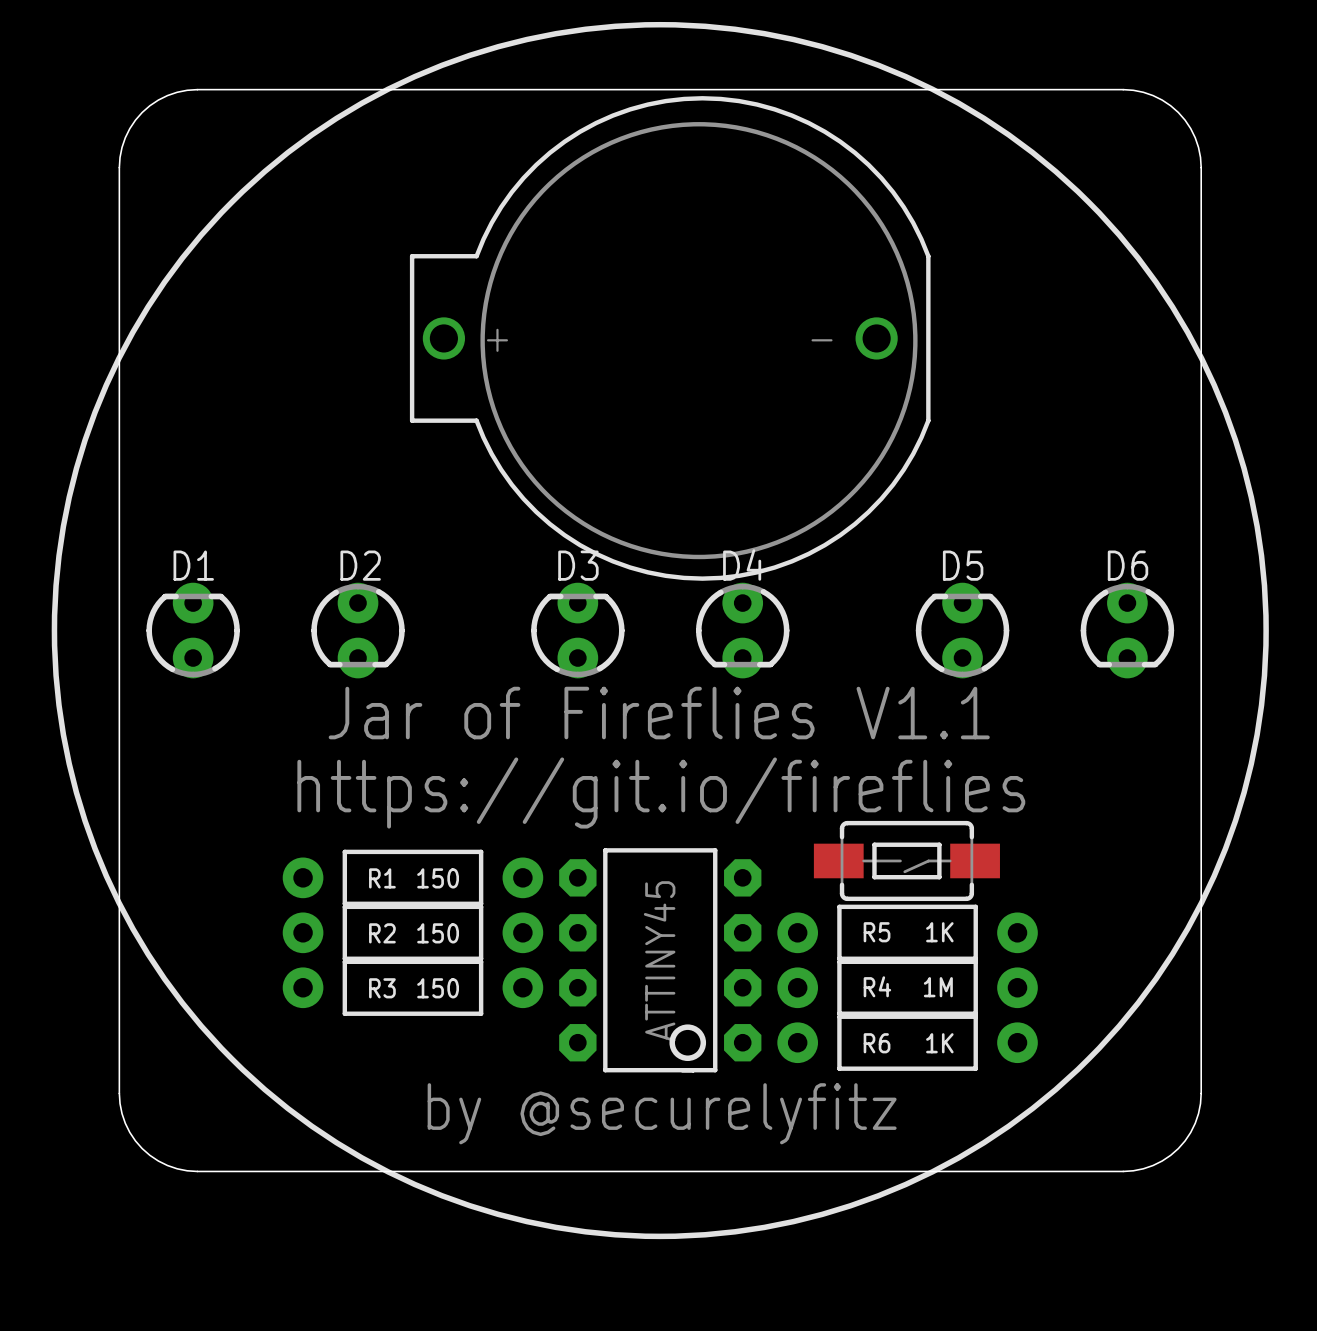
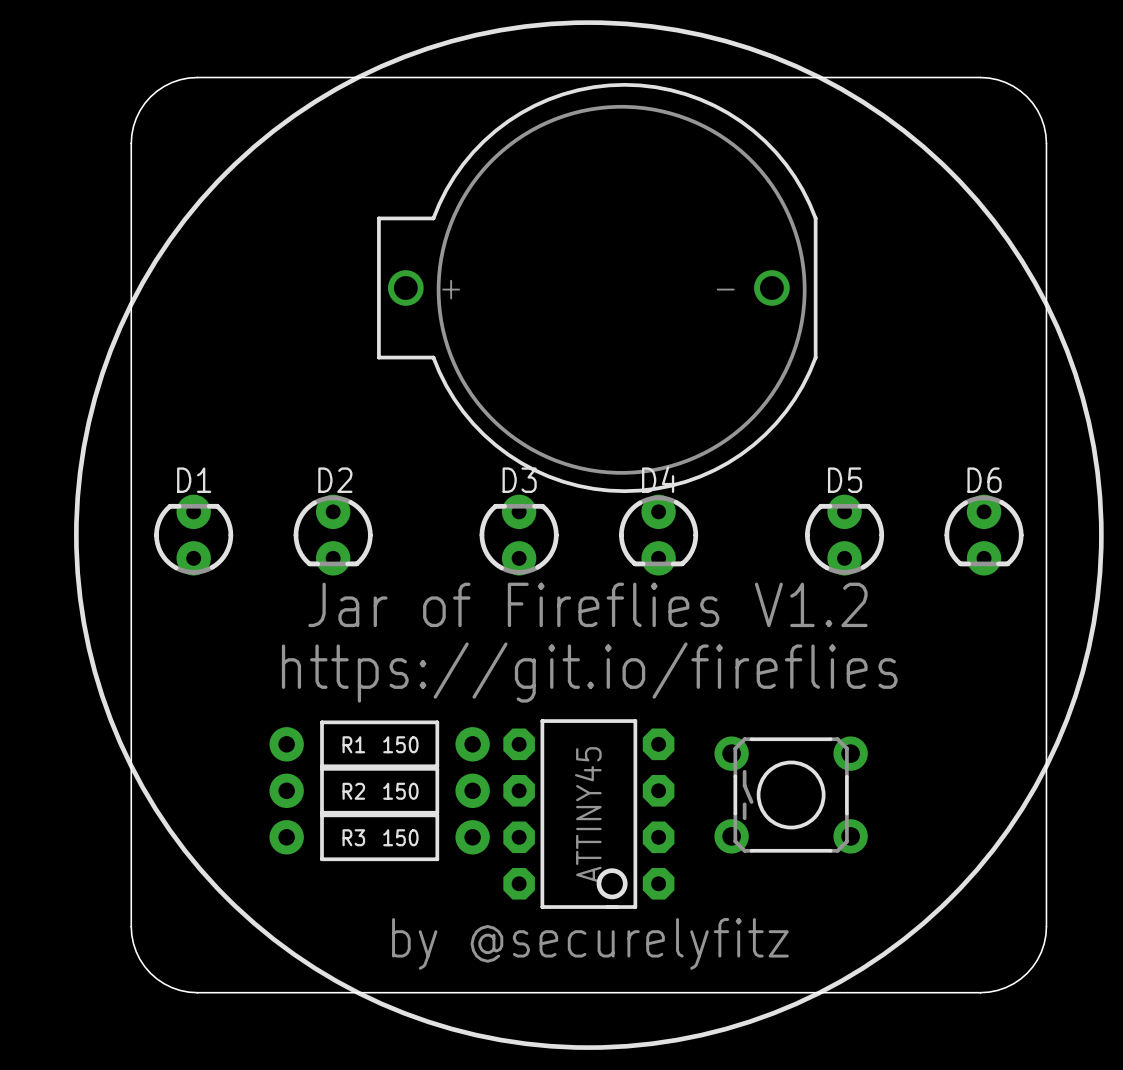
text: Jar of Fireflies V1.1 (659, 713) -> Jar of Fireflies V1.2 (587, 604)
part: (906, 860) -> none
R5: 1K (907, 932) -> none
part: none -> (791, 795)
R4: 1M (907, 987) -> none
R6: 1K (907, 1042) -> none

